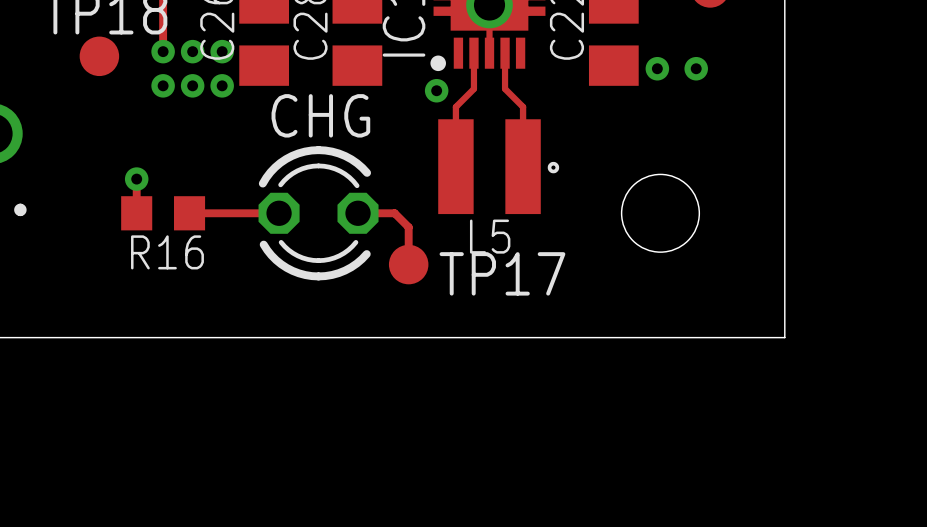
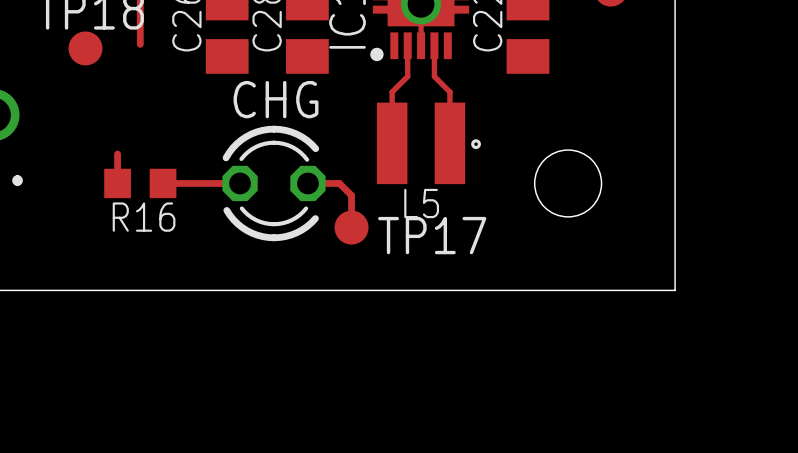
via: (163, 51) -> none
via: (192, 51) -> none
via: (222, 51) -> none
via: (657, 68) -> none
via: (696, 68) -> none
via: (163, 85) -> none
via: (192, 85) -> none
via: (222, 85) -> none
via: (436, 90) -> none
via: (136, 179) -> none

